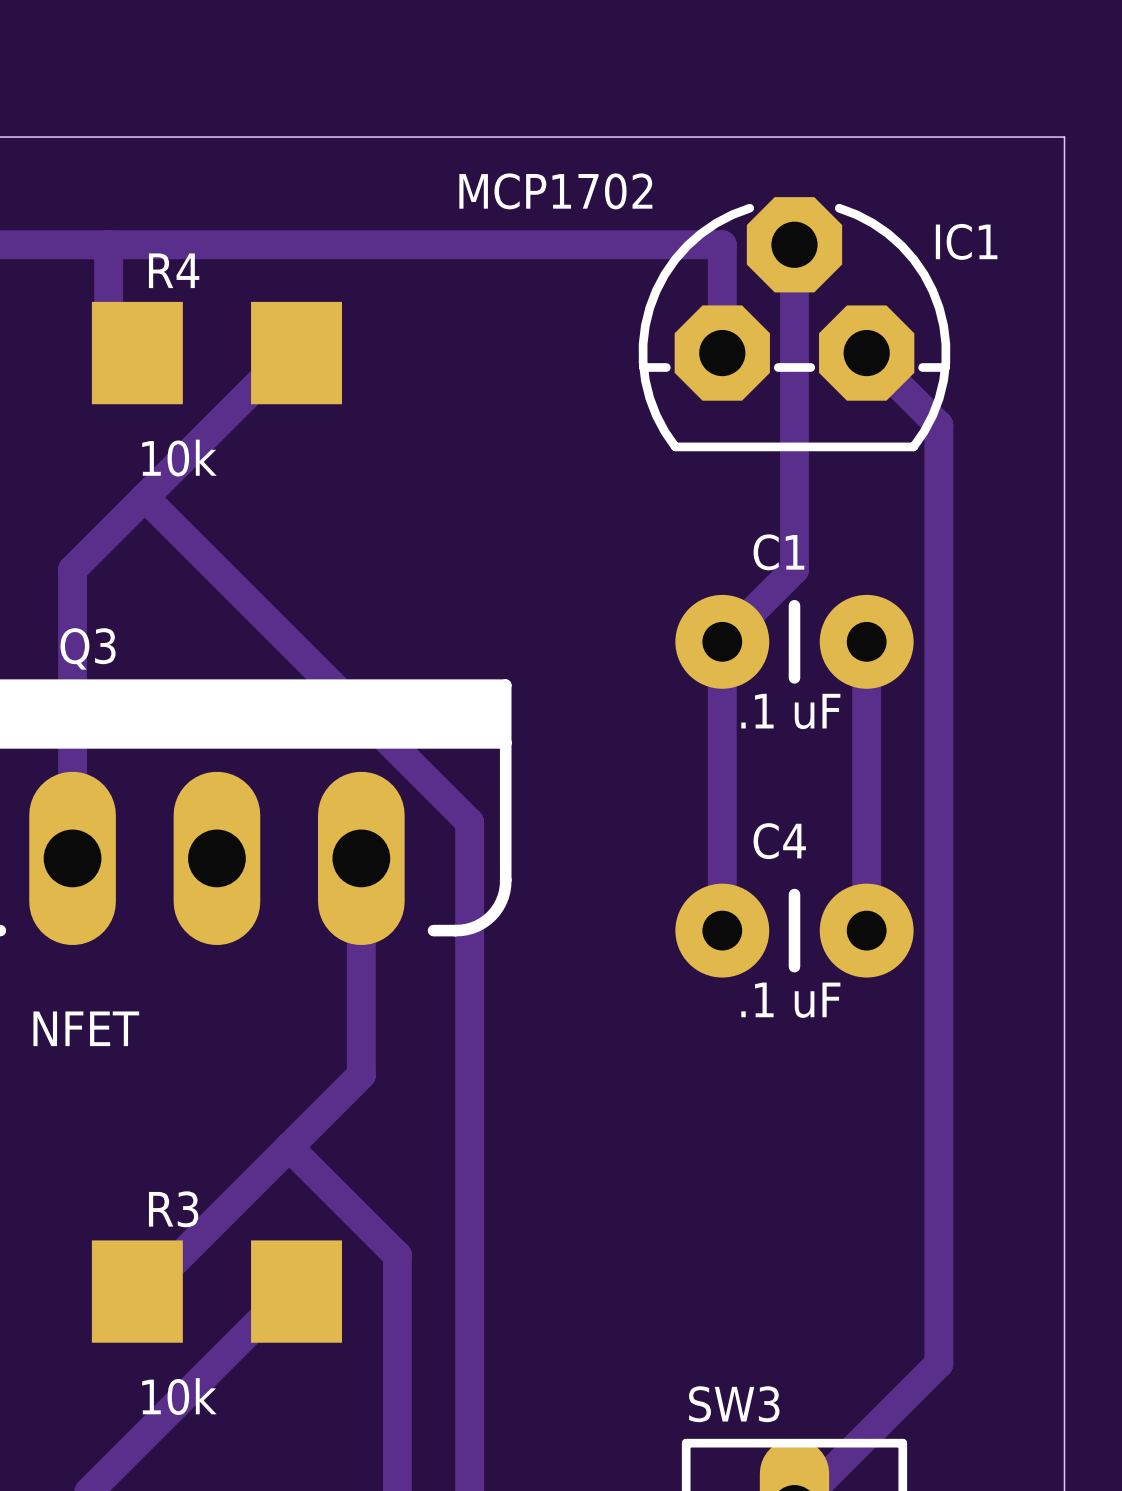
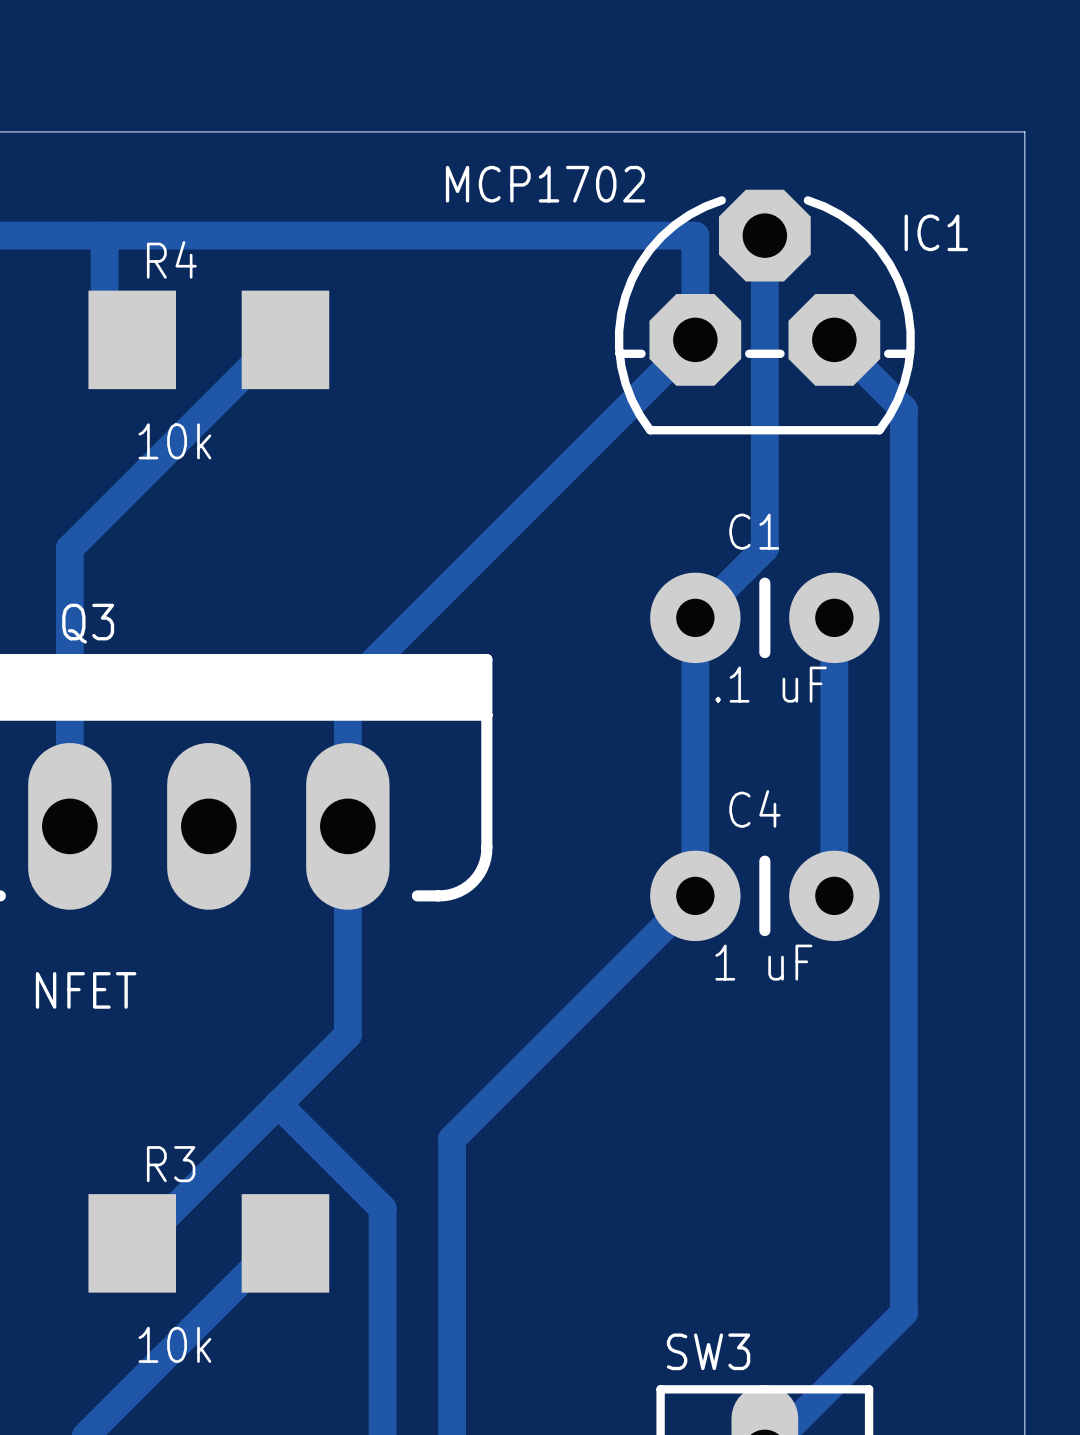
track: none -> (695, 339) (347, 687) (347, 826)
track: (144, 497) (469, 822) (469, 1183) -> (695, 895) (452, 1139)
C4 value: .1 uF (790, 1000) -> 1 uF (763, 962)

